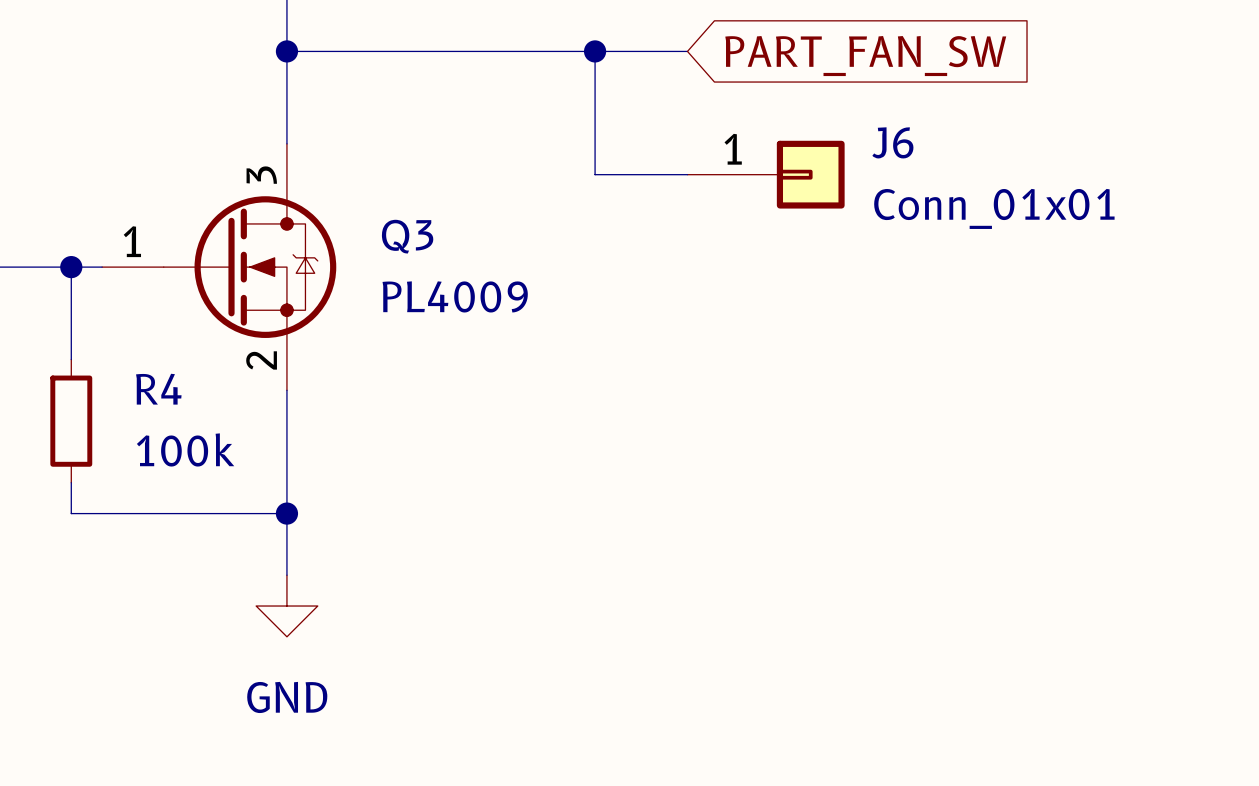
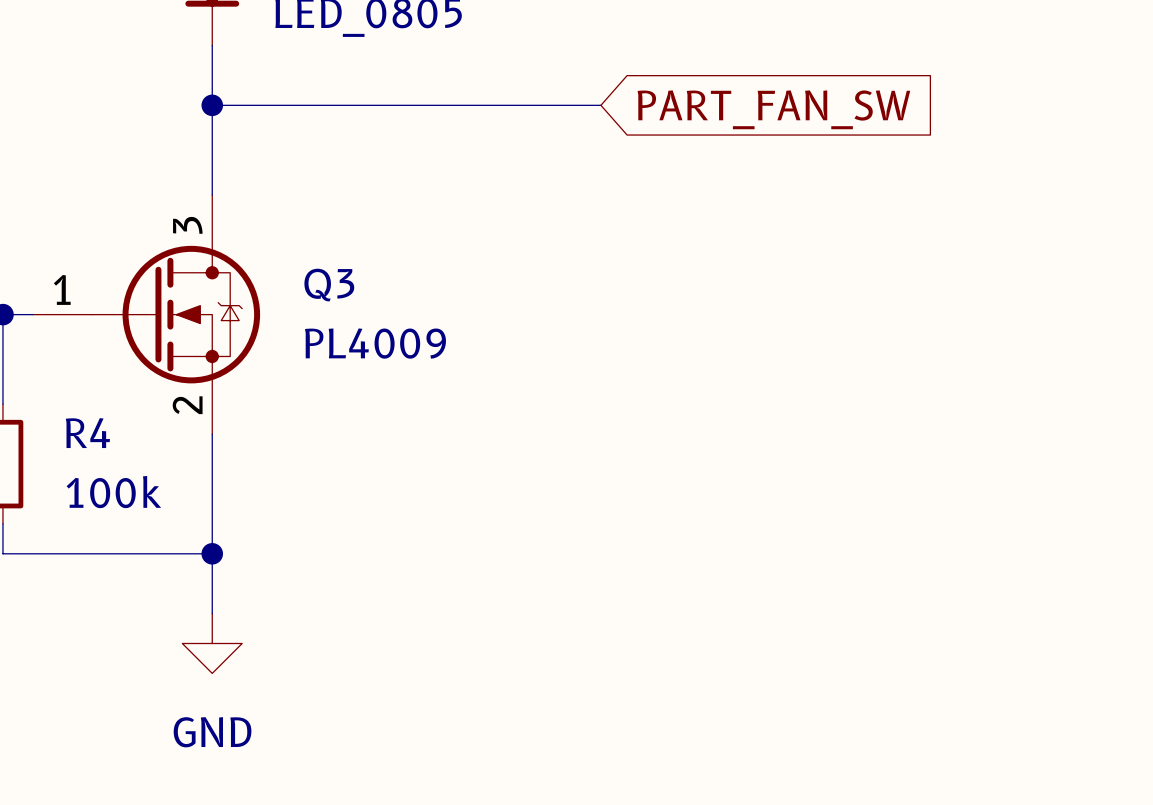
wire: (595, 51) (595, 174) (687, 174) -> none
junction: (595, 51) -> none
J6: Conn_01x01 (766, 174) -> none

